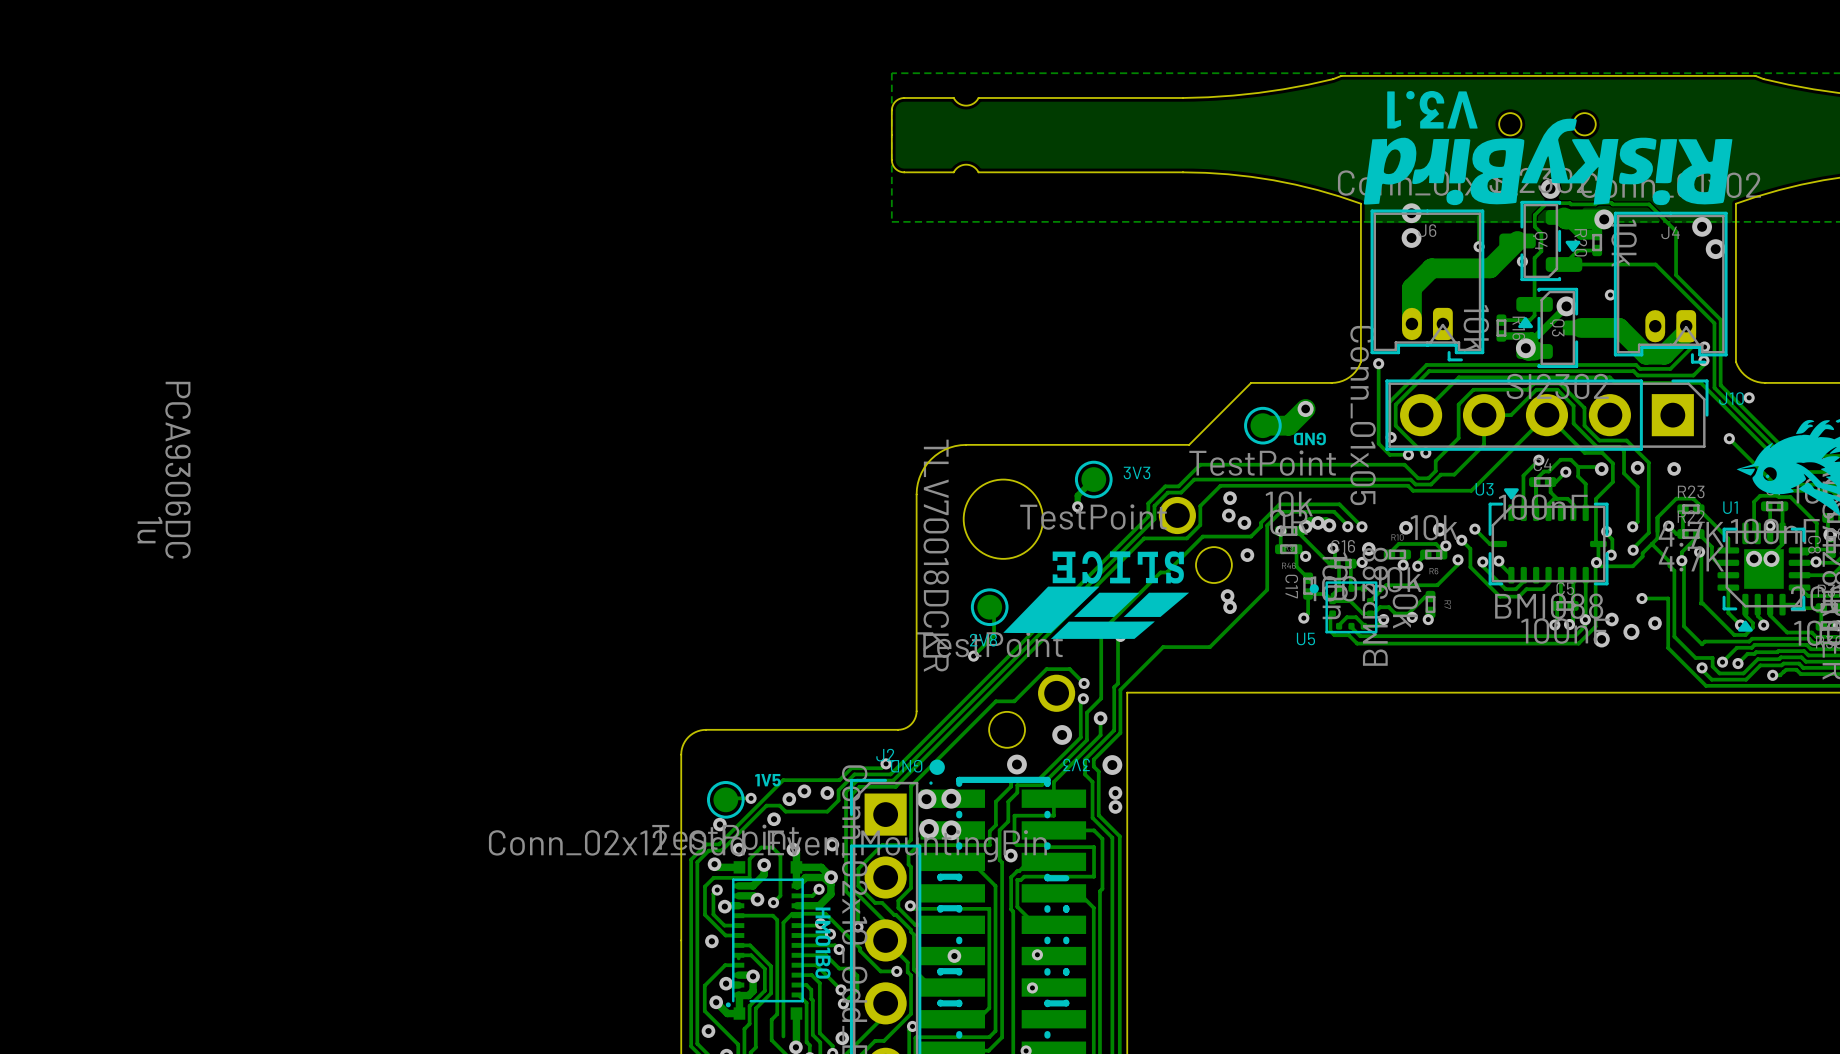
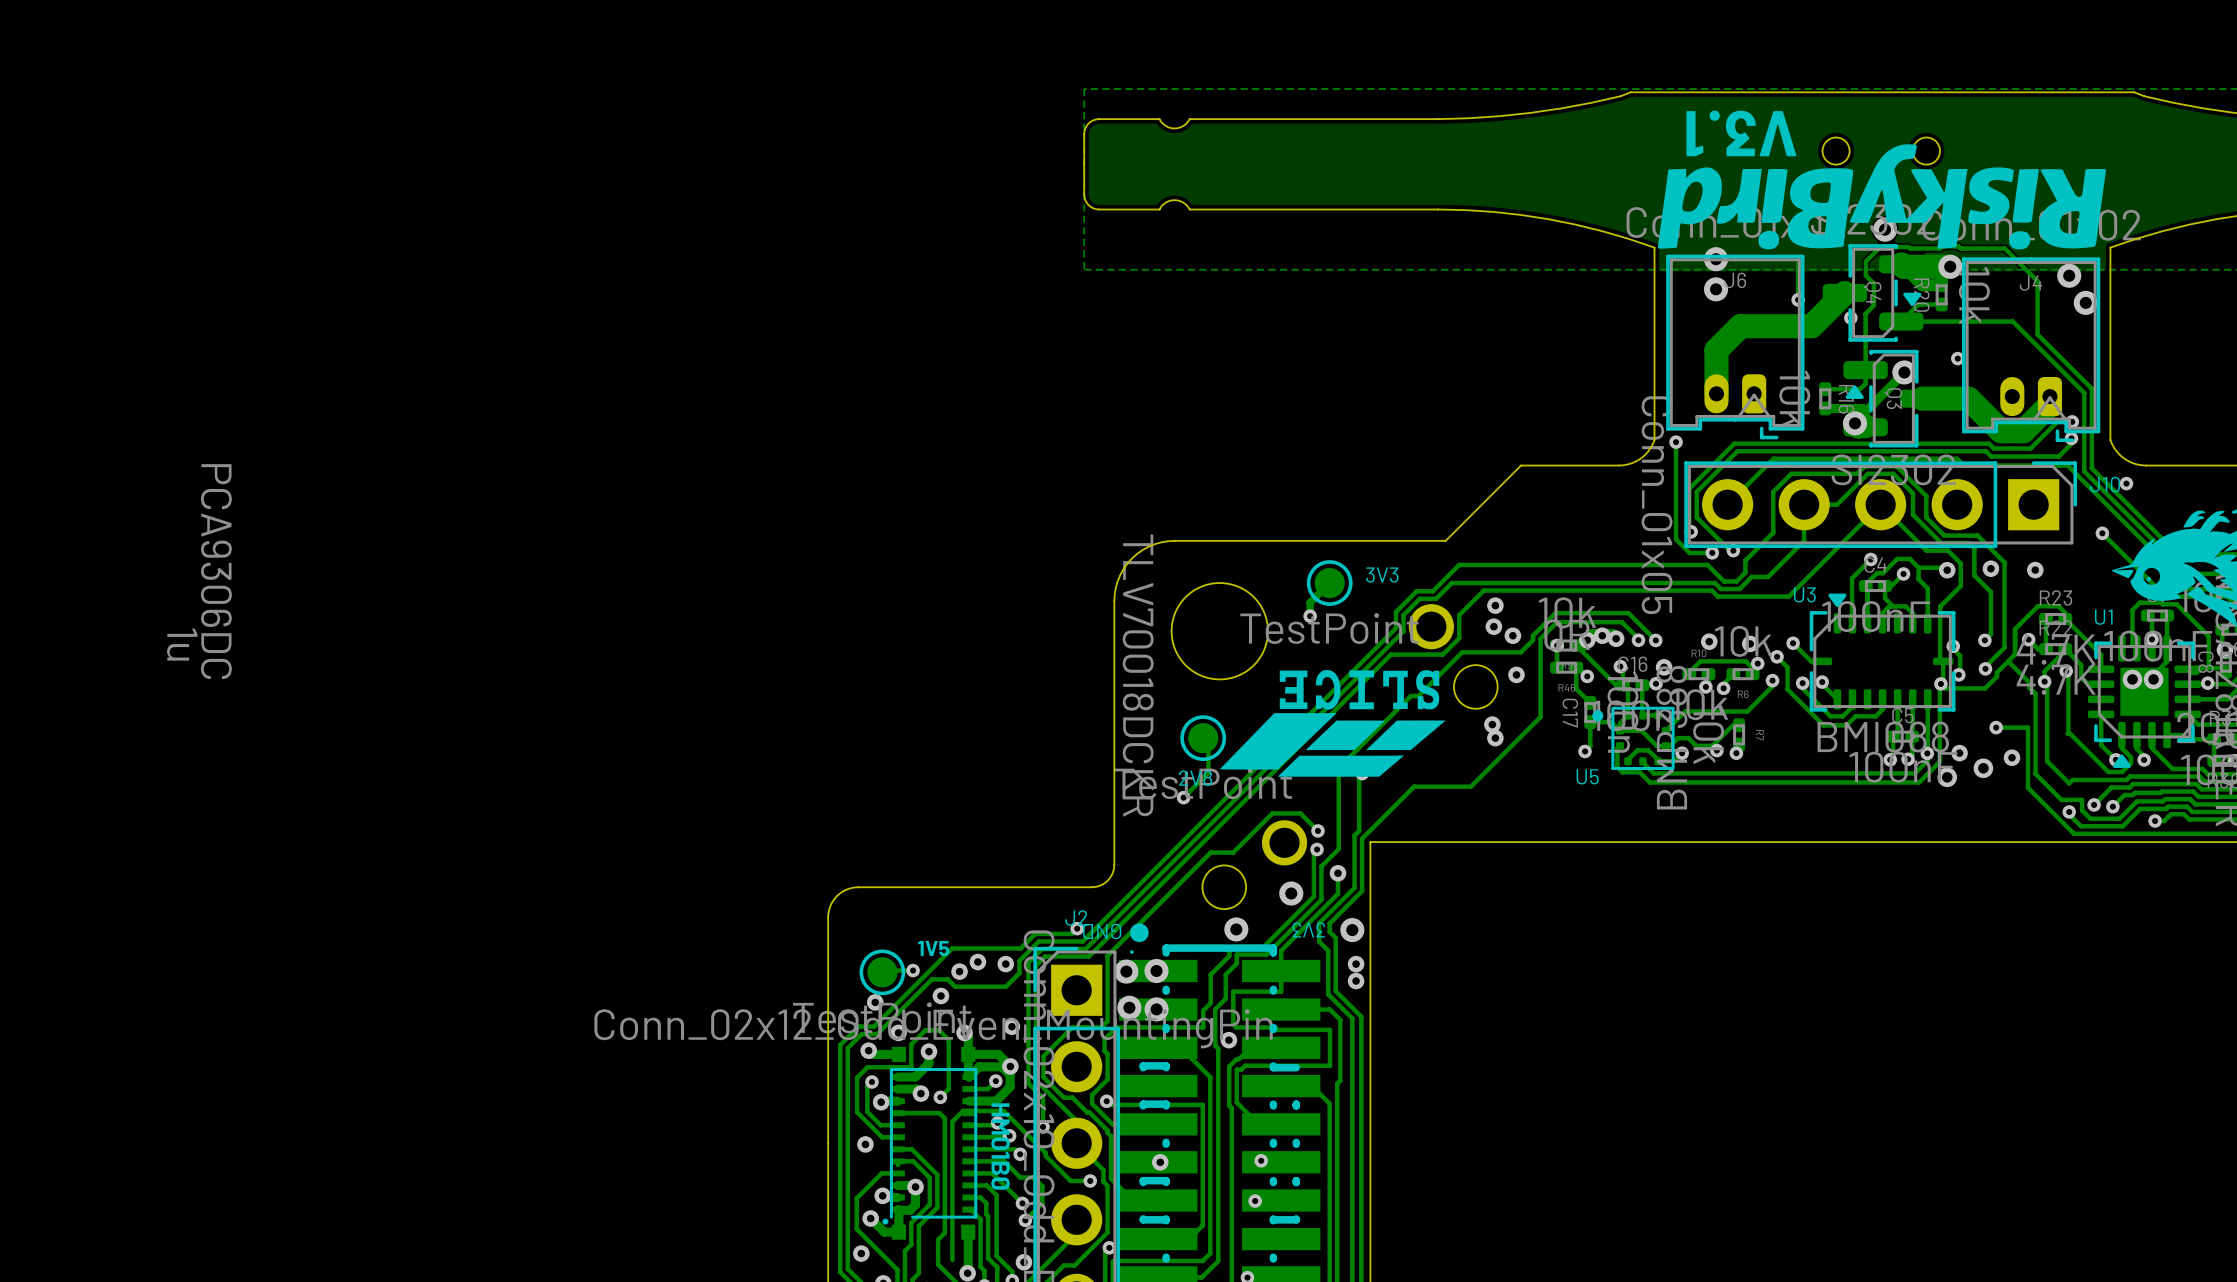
track: (1305, 408) (1288, 425) (1262, 425) -> none
via: (1305, 408) -> none
part: TestPoint (1262, 425) -> none
text: GND (1309, 438) -> none

